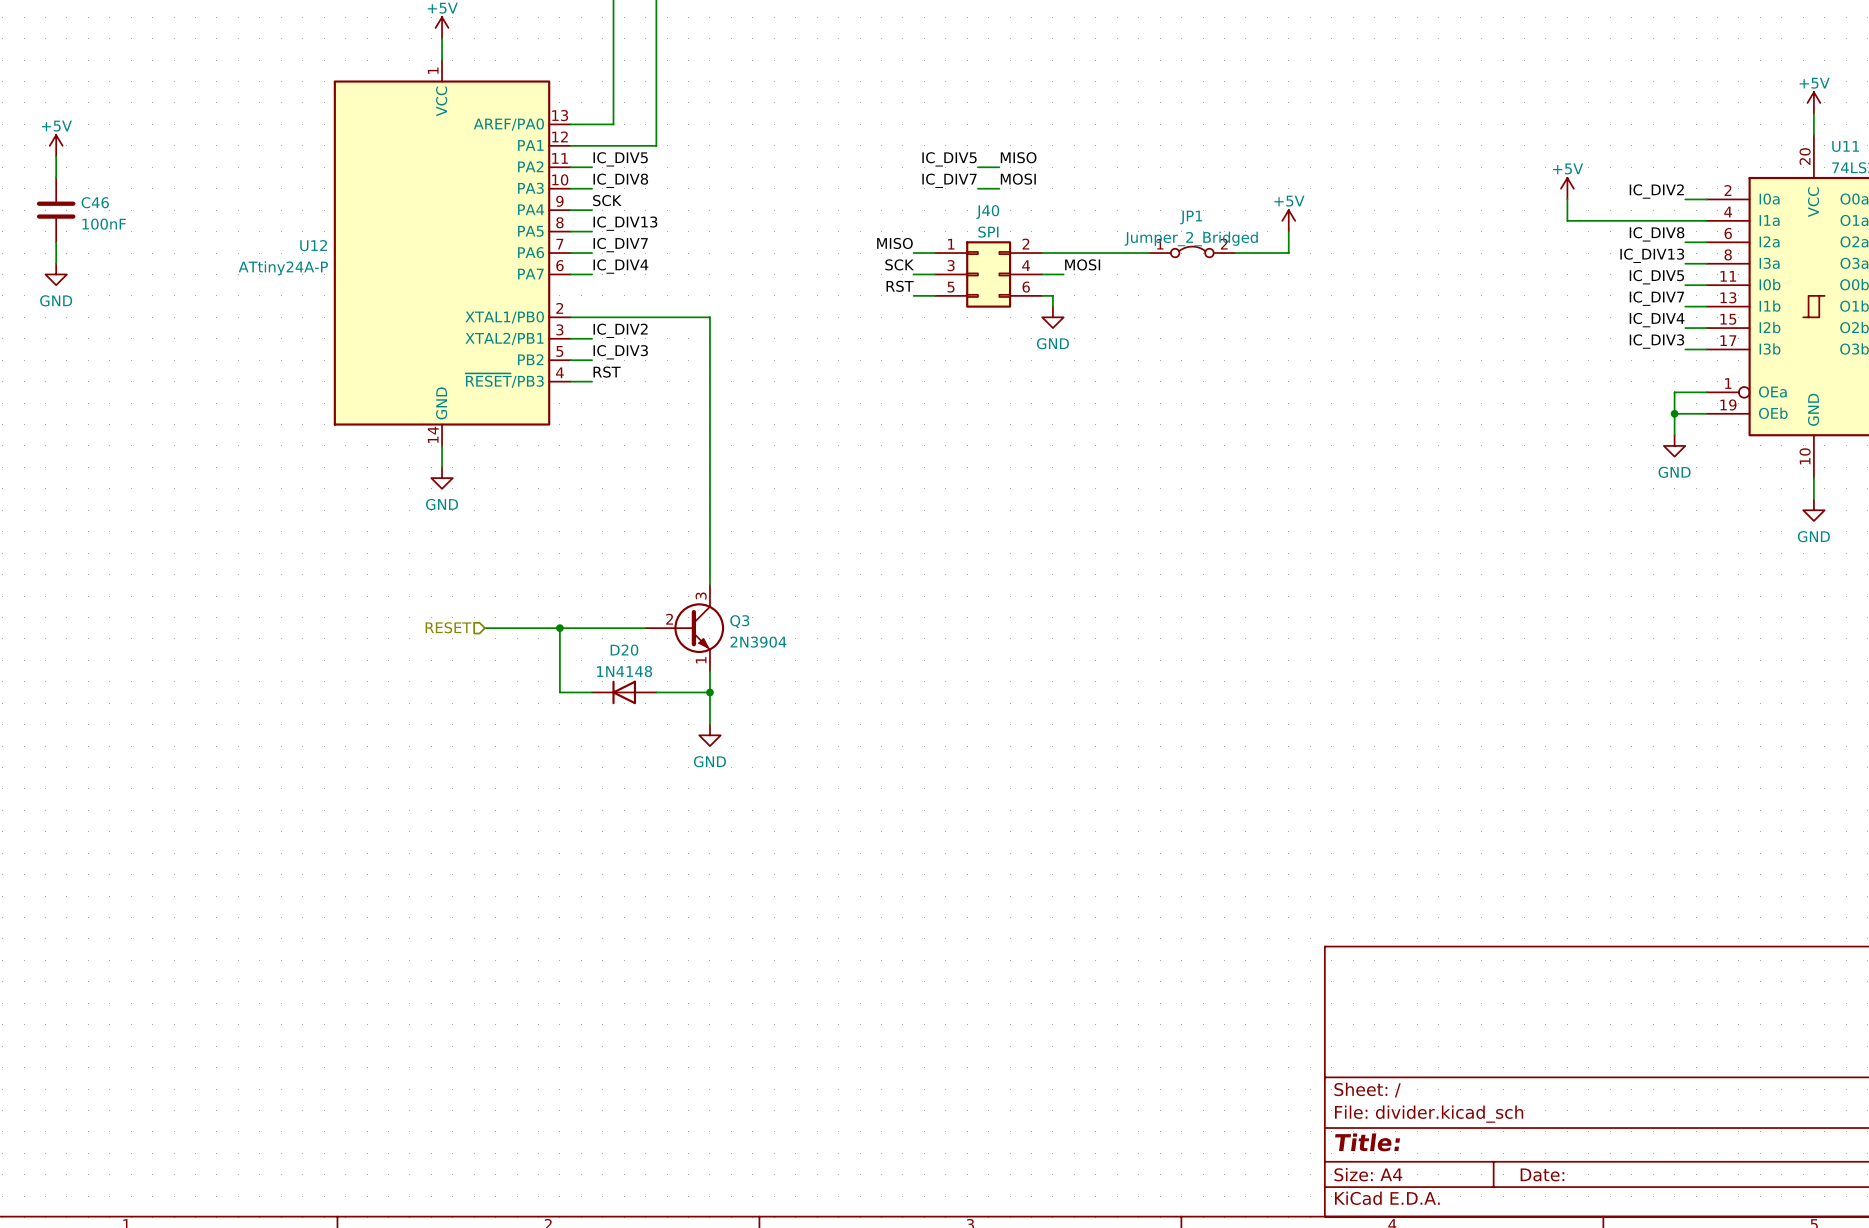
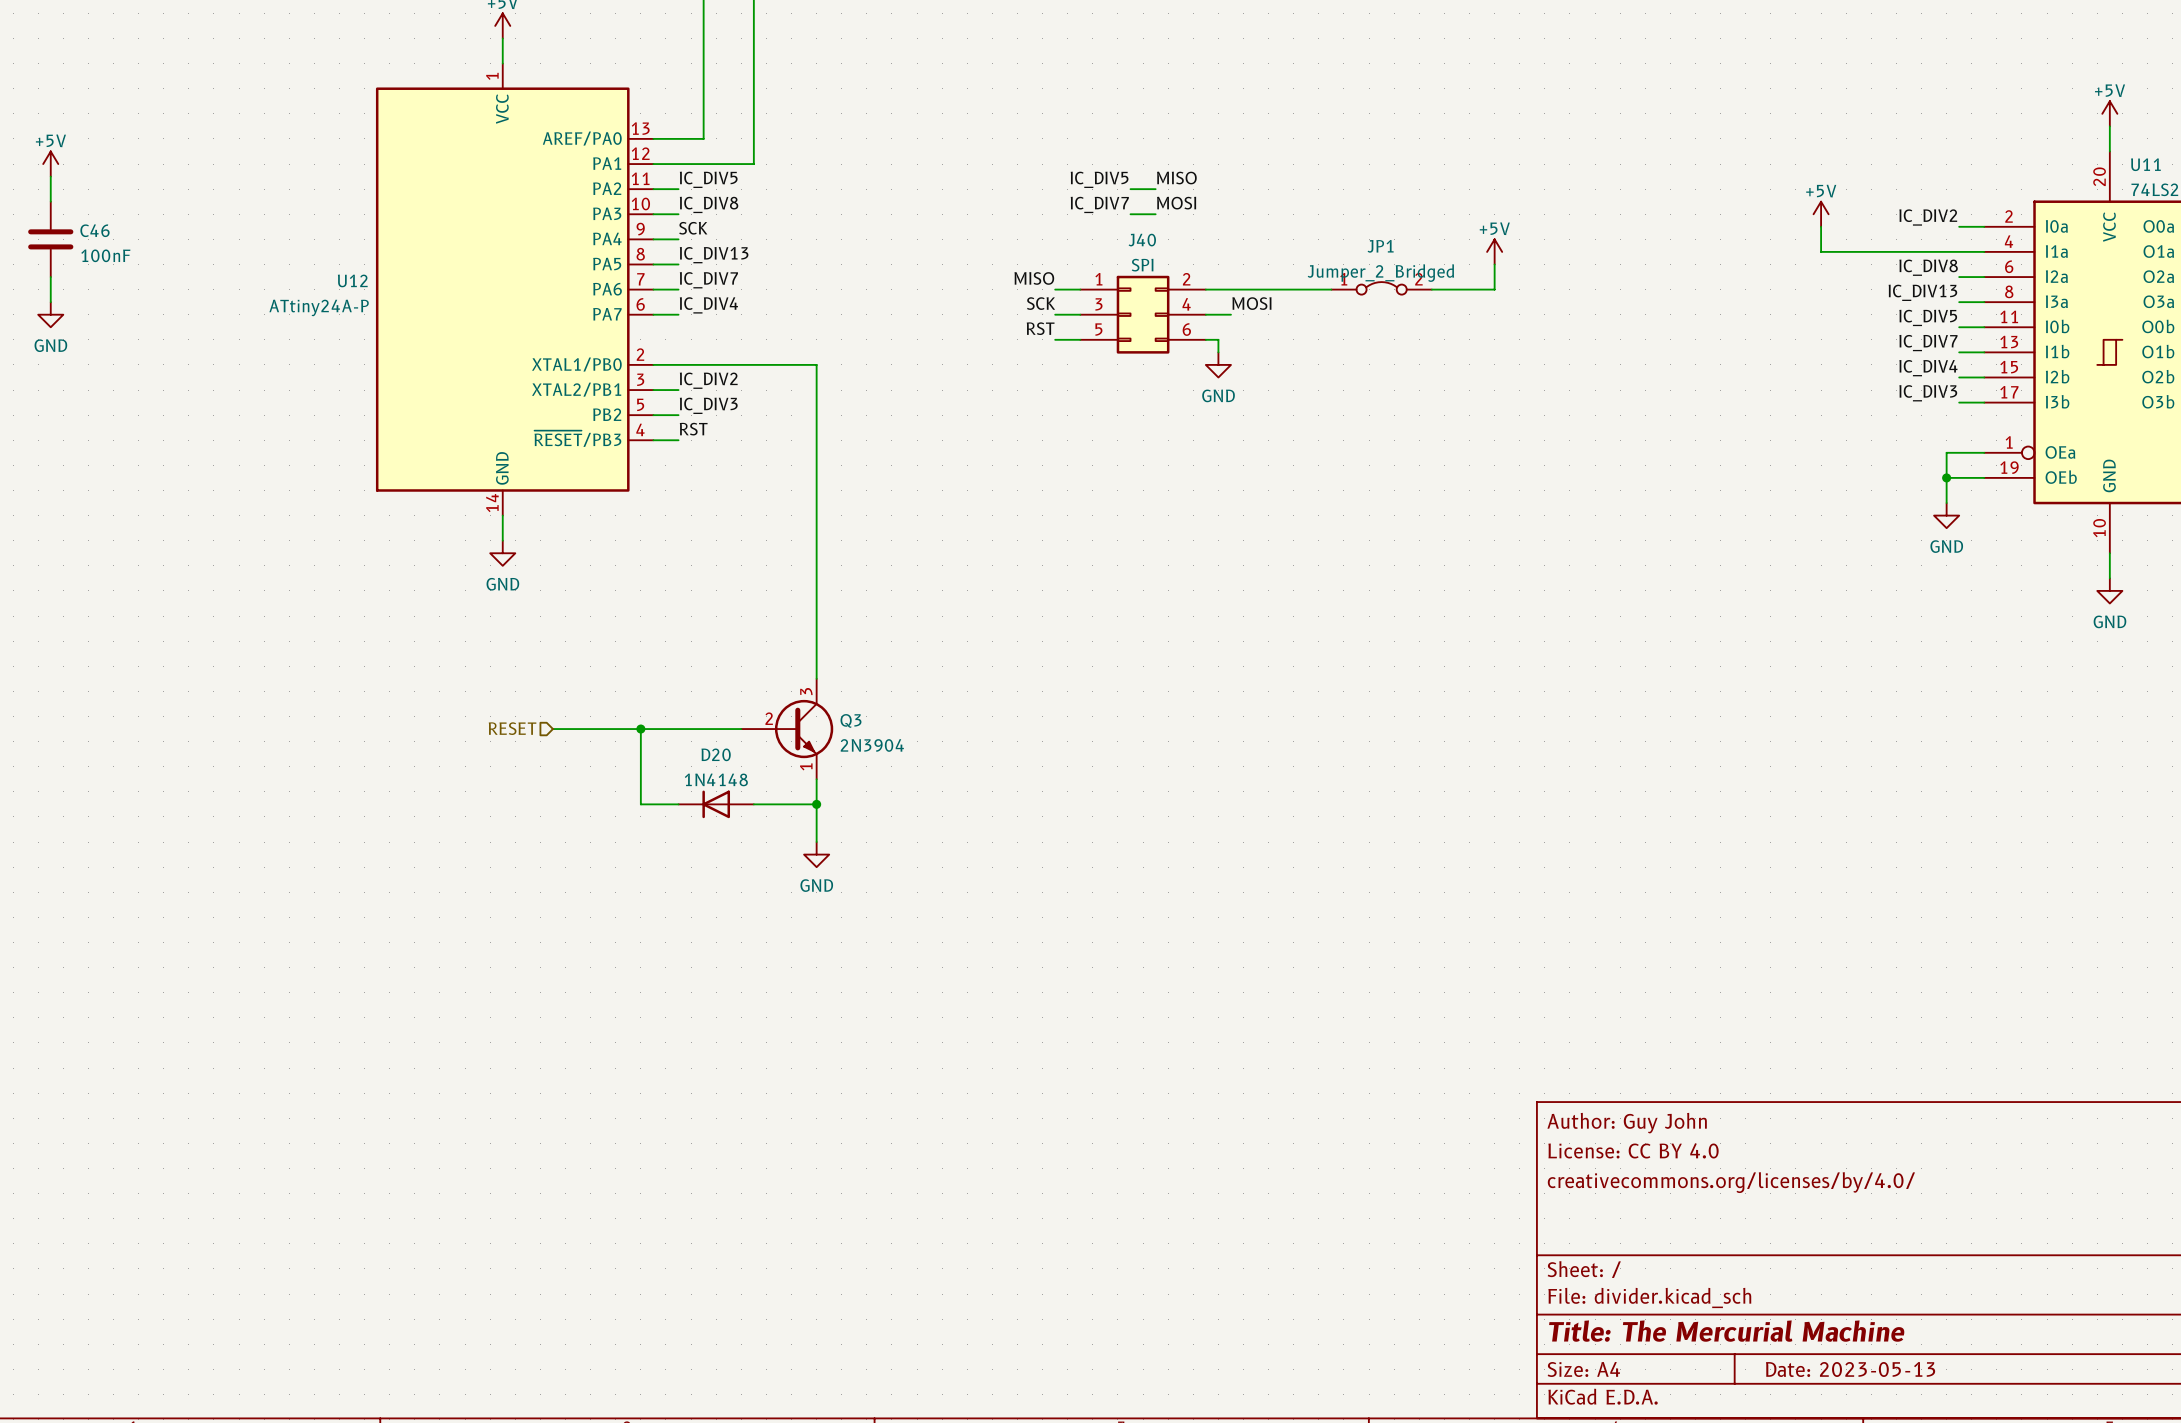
title block: none -> Author: Guy John (1627, 1123)
title block: none -> License: CC BY 4.0 (1633, 1151)
title block: none -> creativecommons.org/licenses/by/4.0/ (1731, 1182)
title block: Title: (1367, 1142) -> Title: The Mercurial Machine (1726, 1331)
title block: Date: (1542, 1174) -> Date: 2023-05-13 (1850, 1369)

